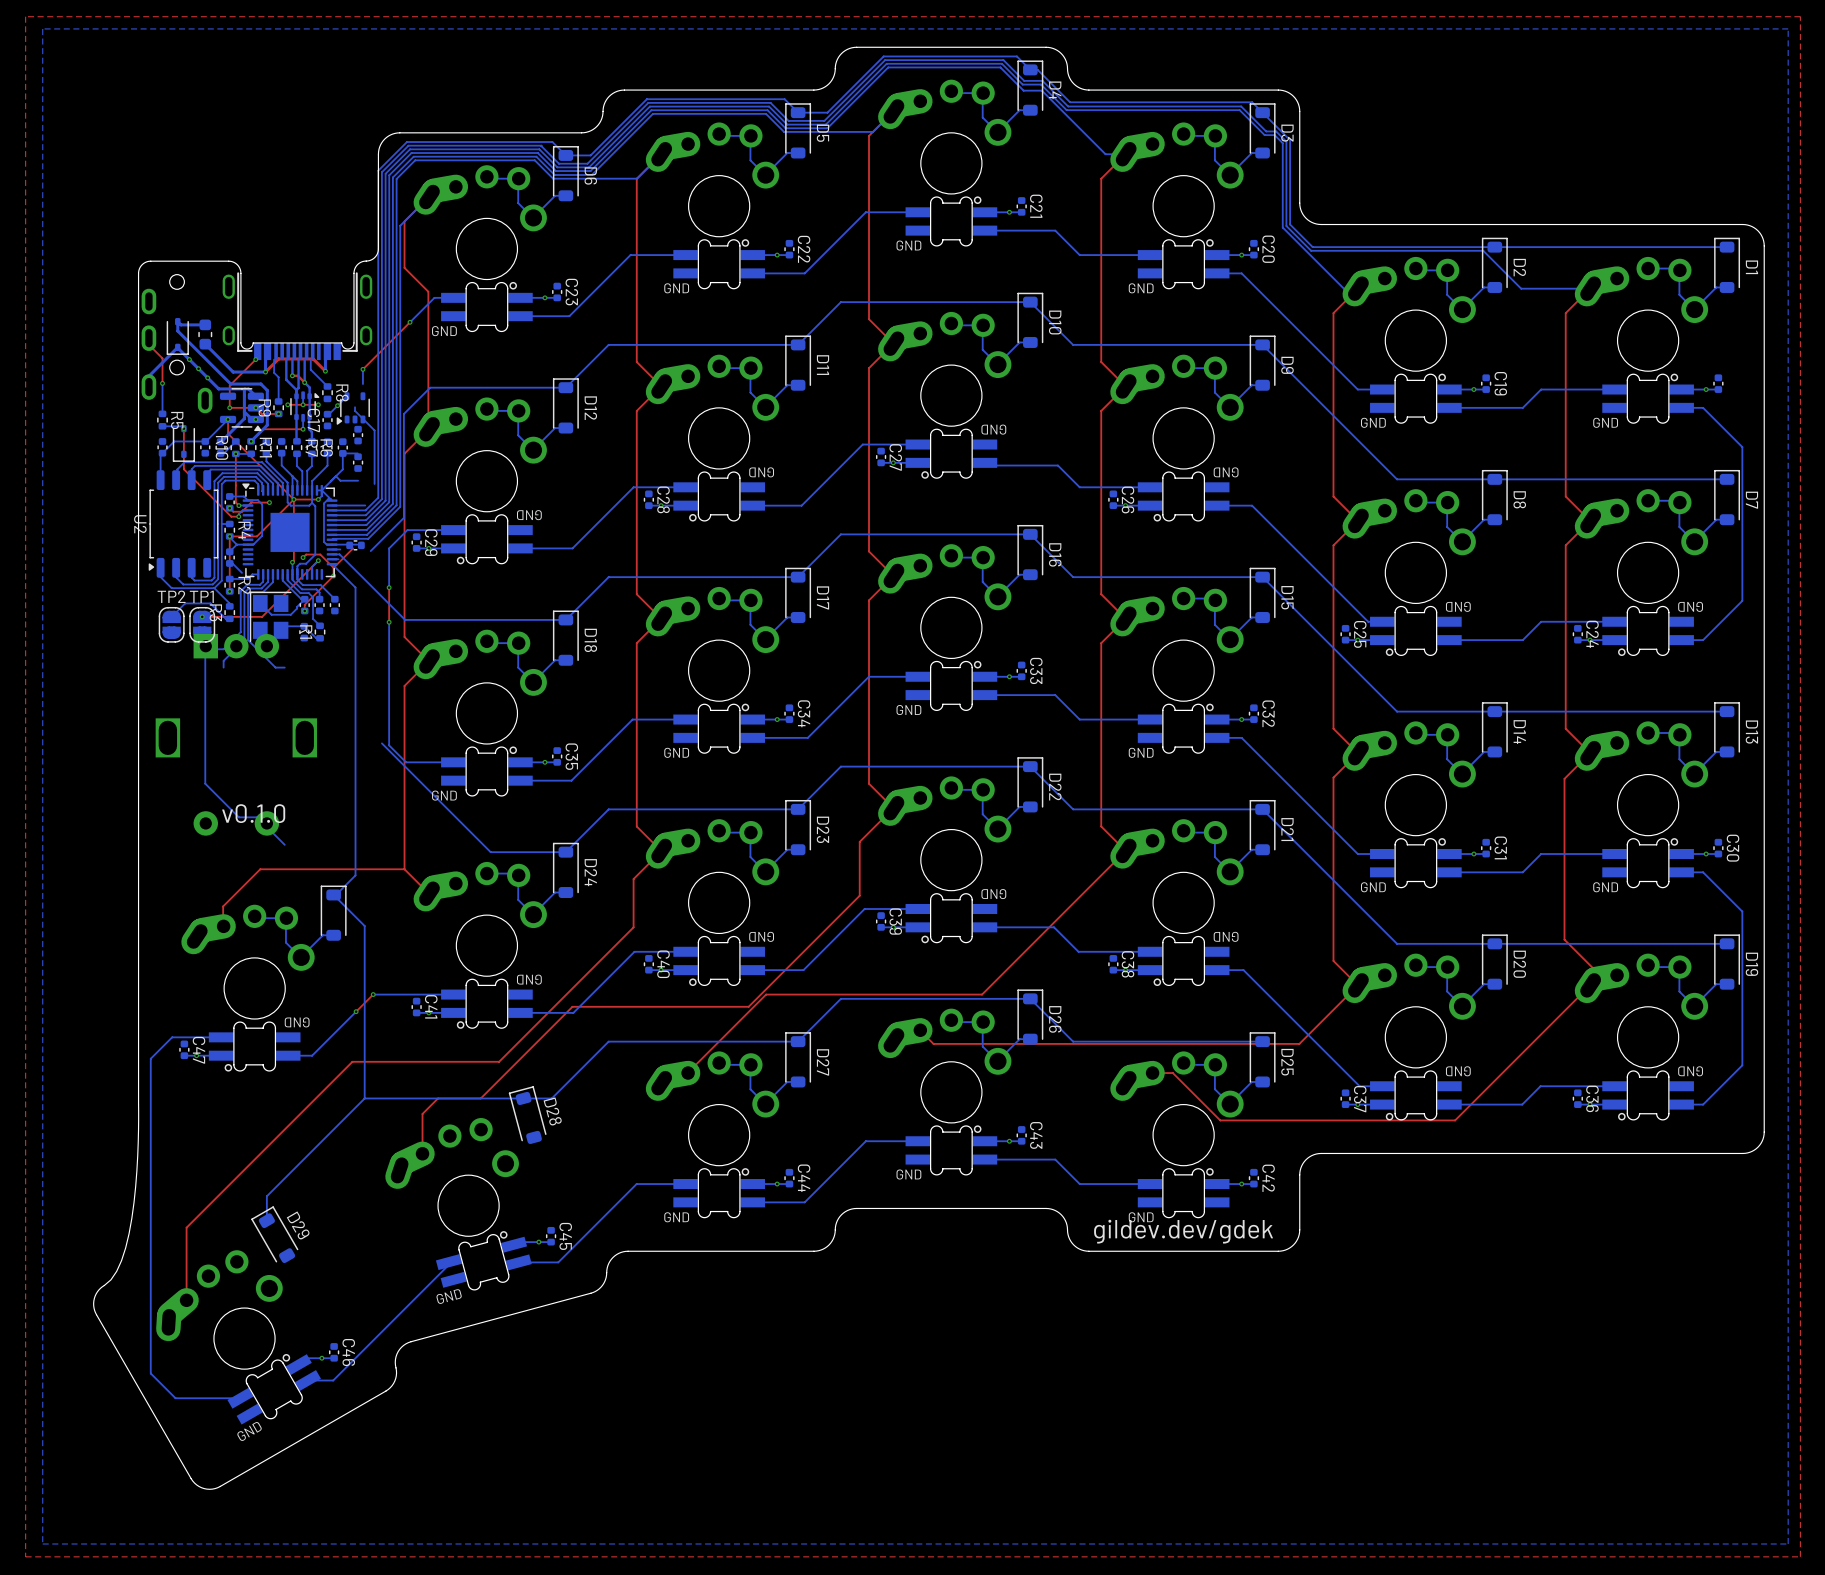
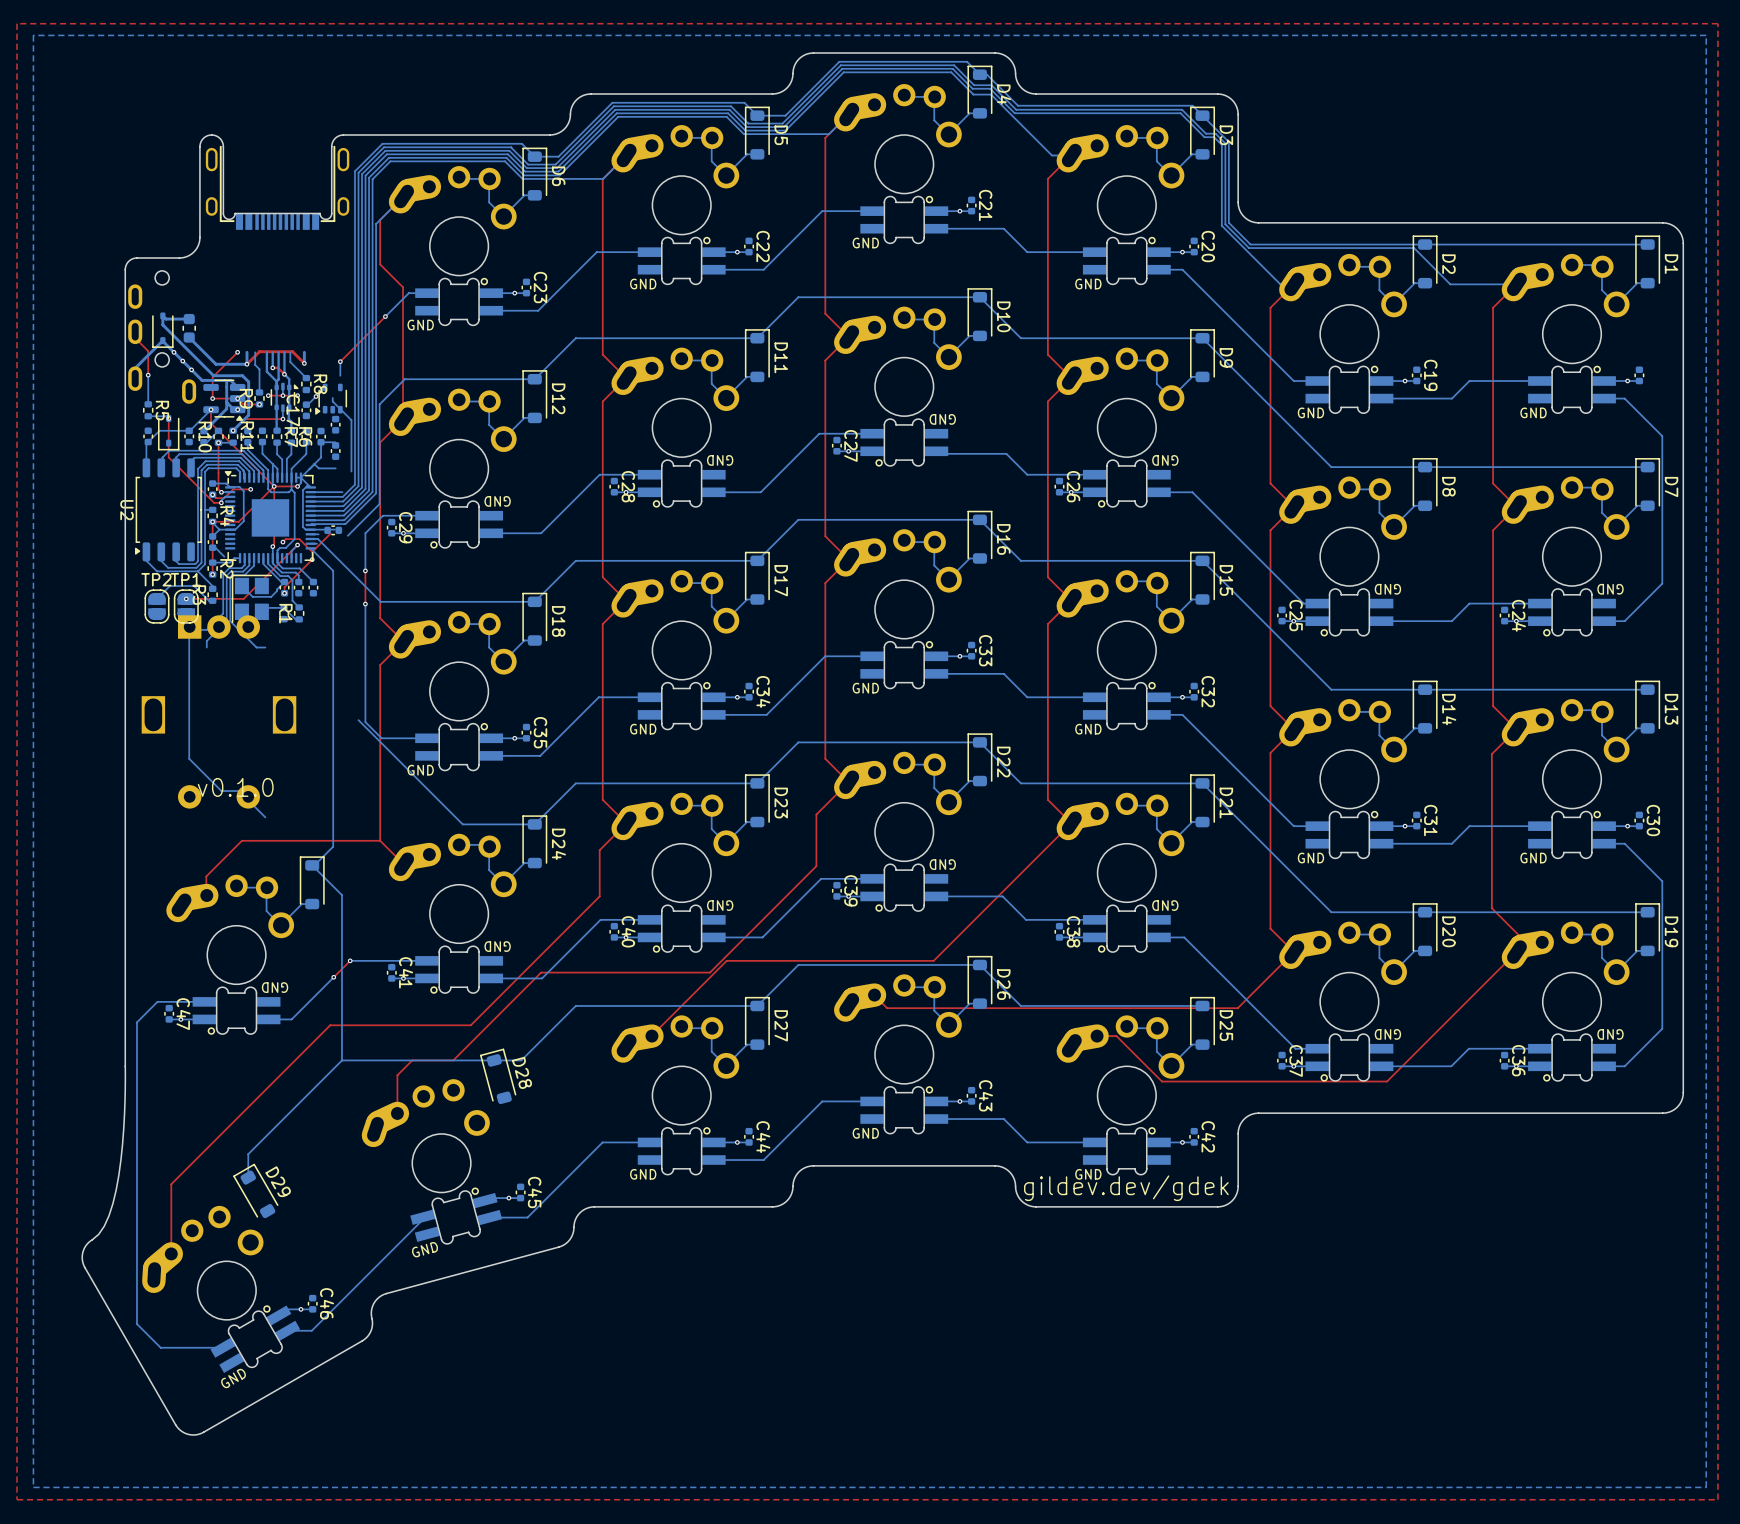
board edge: (399, 132) (386, 137) (378, 149) (378, 250) (373, 258) (359, 262) (354, 270) (353, 342) (350, 348) (344, 348) (341, 342) (253, 342) (250, 348) (243, 348) (240, 342) (240, 273) (239, 266) (230, 261) (195, 261) -> (375, 135) (342, 135) (333, 140) (331, 146) (331, 214) (325, 219) (321, 217) (320, 213) (235, 213) (231, 218) (225, 218) (223, 213) (223, 144) (216, 136) (205, 136) (200, 145) (199, 242) (192, 253) (179, 258)
part position: (297, 316) -> (277, 187)

